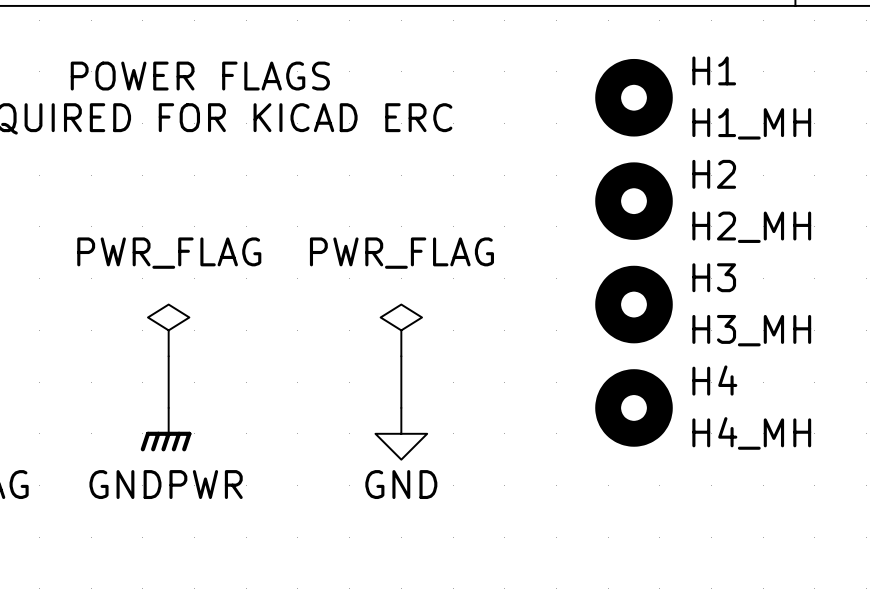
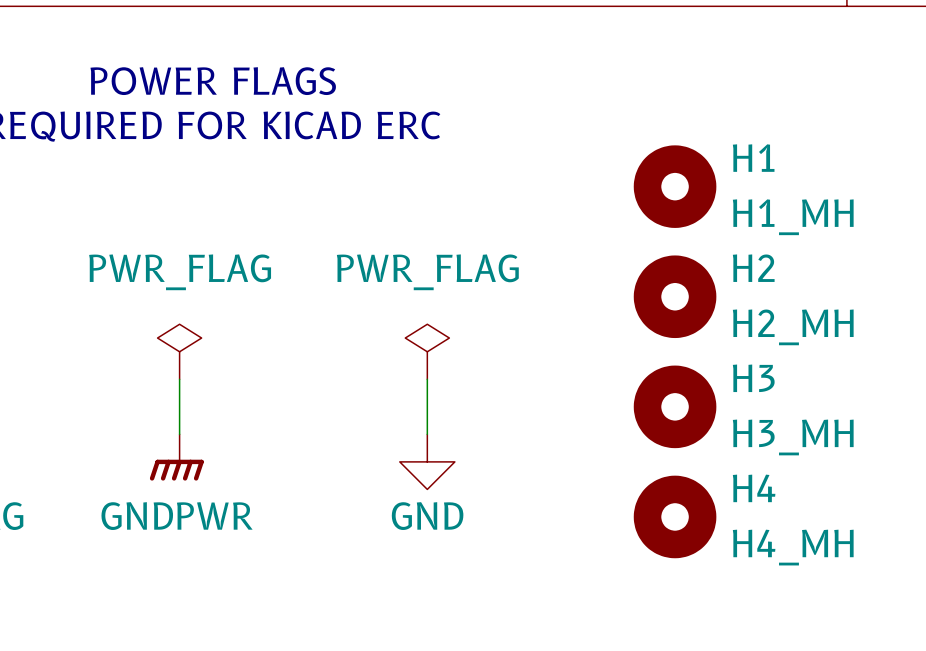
H1 position: (634, 97) -> (675, 186)
H2 position: (634, 201) -> (675, 296)
H3 position: (634, 304) -> (675, 406)
H4 position: (634, 407) -> (675, 516)

